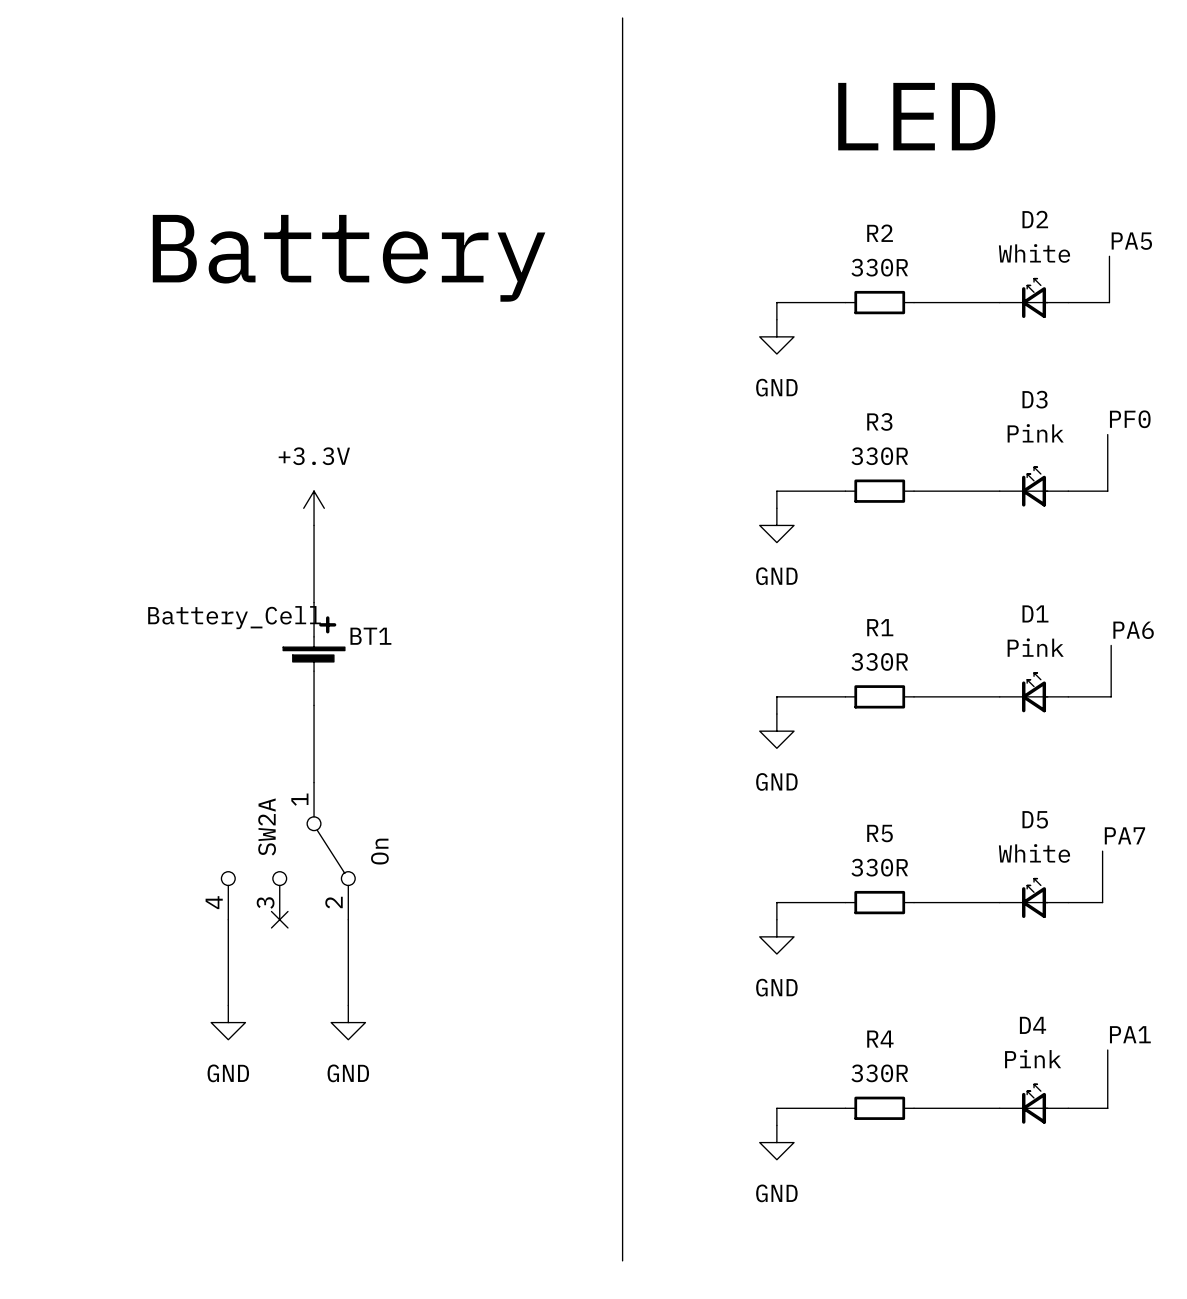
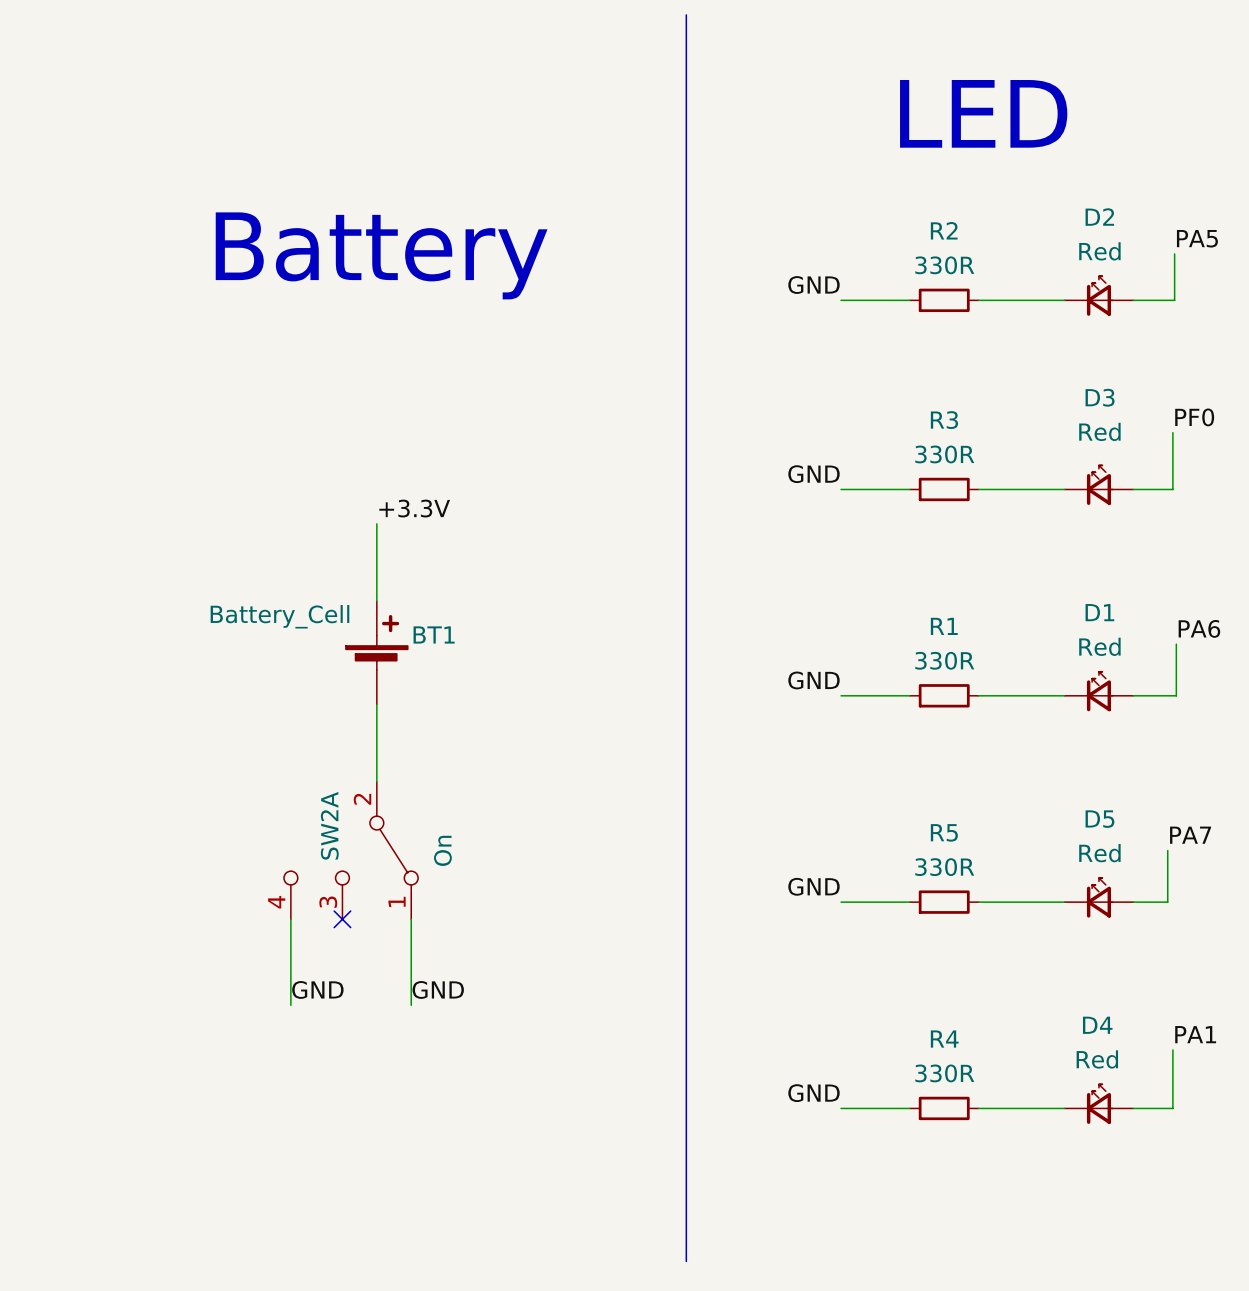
D2 value: White (1034, 253) -> Red (1099, 251)
label: none -> GND (813, 285)
wire: (776, 302) (776, 319) -> none
power symbol: GND (776, 336) -> none
D3 value: Pink (1035, 433) -> Red (1099, 431)
label: none -> GND (813, 474)
wire: (776, 491) (776, 508) -> none
power symbol: +3.3V (314, 508) -> none
label: none -> +3.3V (414, 508)
power symbol: GND (776, 525) -> none
D1 value: Pink (1035, 647) -> Red (1099, 646)
label: none -> GND (813, 680)
wire: (776, 696) (776, 714) -> none
power symbol: GND (776, 731) -> none
SW2A pin number: 1 (299, 799) -> 2 (362, 799)
D5 value: White (1034, 853) -> Red (1099, 853)
label: none -> GND (813, 886)
SW2A pin number: 2 (334, 902) -> 1 (397, 901)
wire: (776, 902) (776, 919) -> none
power symbol: GND (776, 936) -> none
label: none -> GND (317, 989)
label: none -> GND (438, 989)
power symbol: GND (228, 1022) -> none
power symbol: GND (348, 1022) -> none
D4 value: Pink (1033, 1059) -> Red (1097, 1059)
label: none -> GND (813, 1093)
wire: (776, 1108) (776, 1125) -> none
power symbol: GND (776, 1142) -> none

